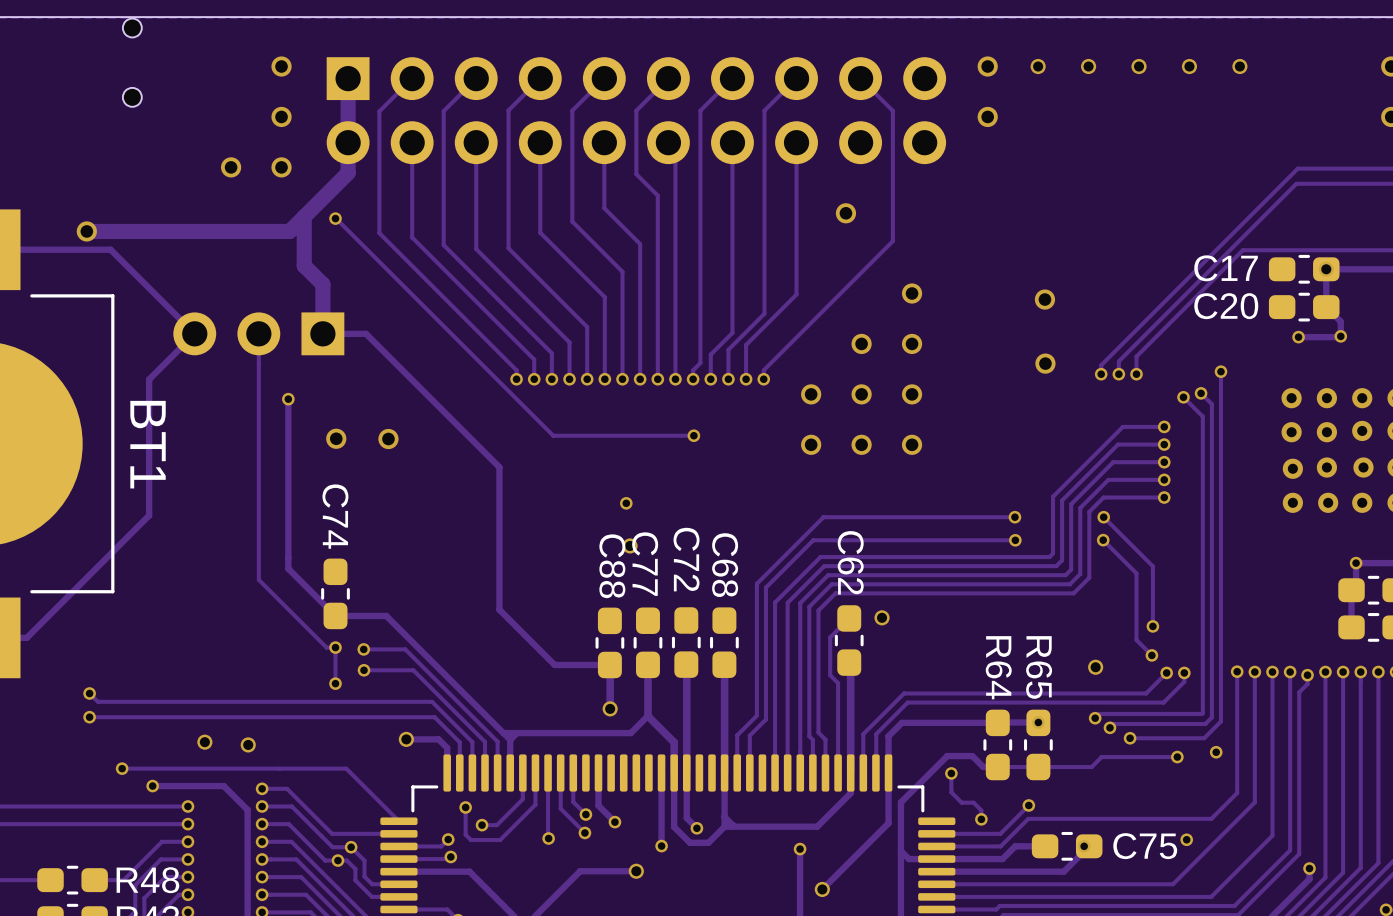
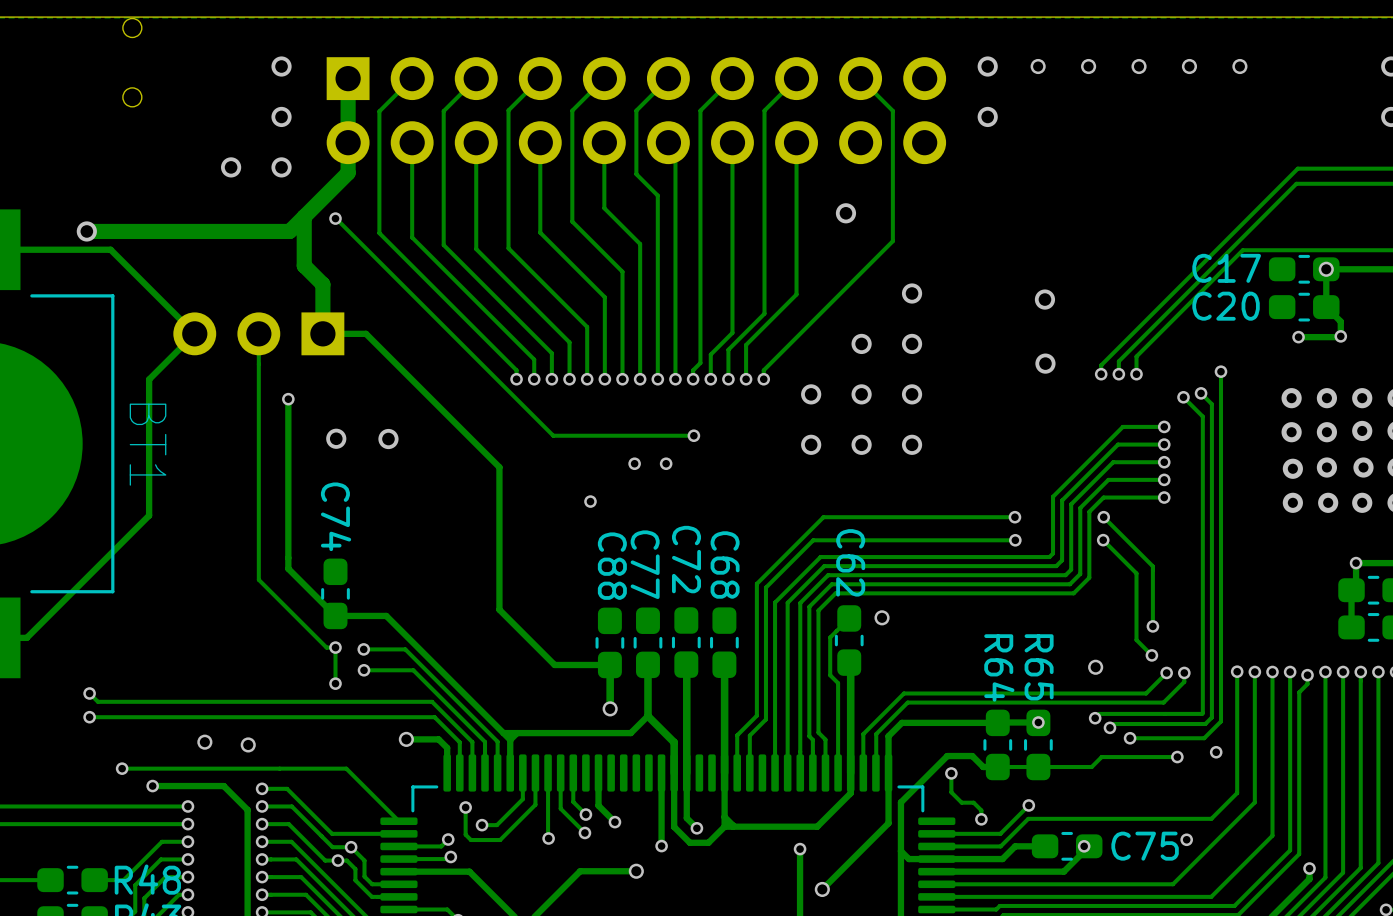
via: none -> (634, 463)
via: none -> (666, 463)
via: none -> (590, 501)
via: (626, 503) -> none
via: (630, 545) -> none

